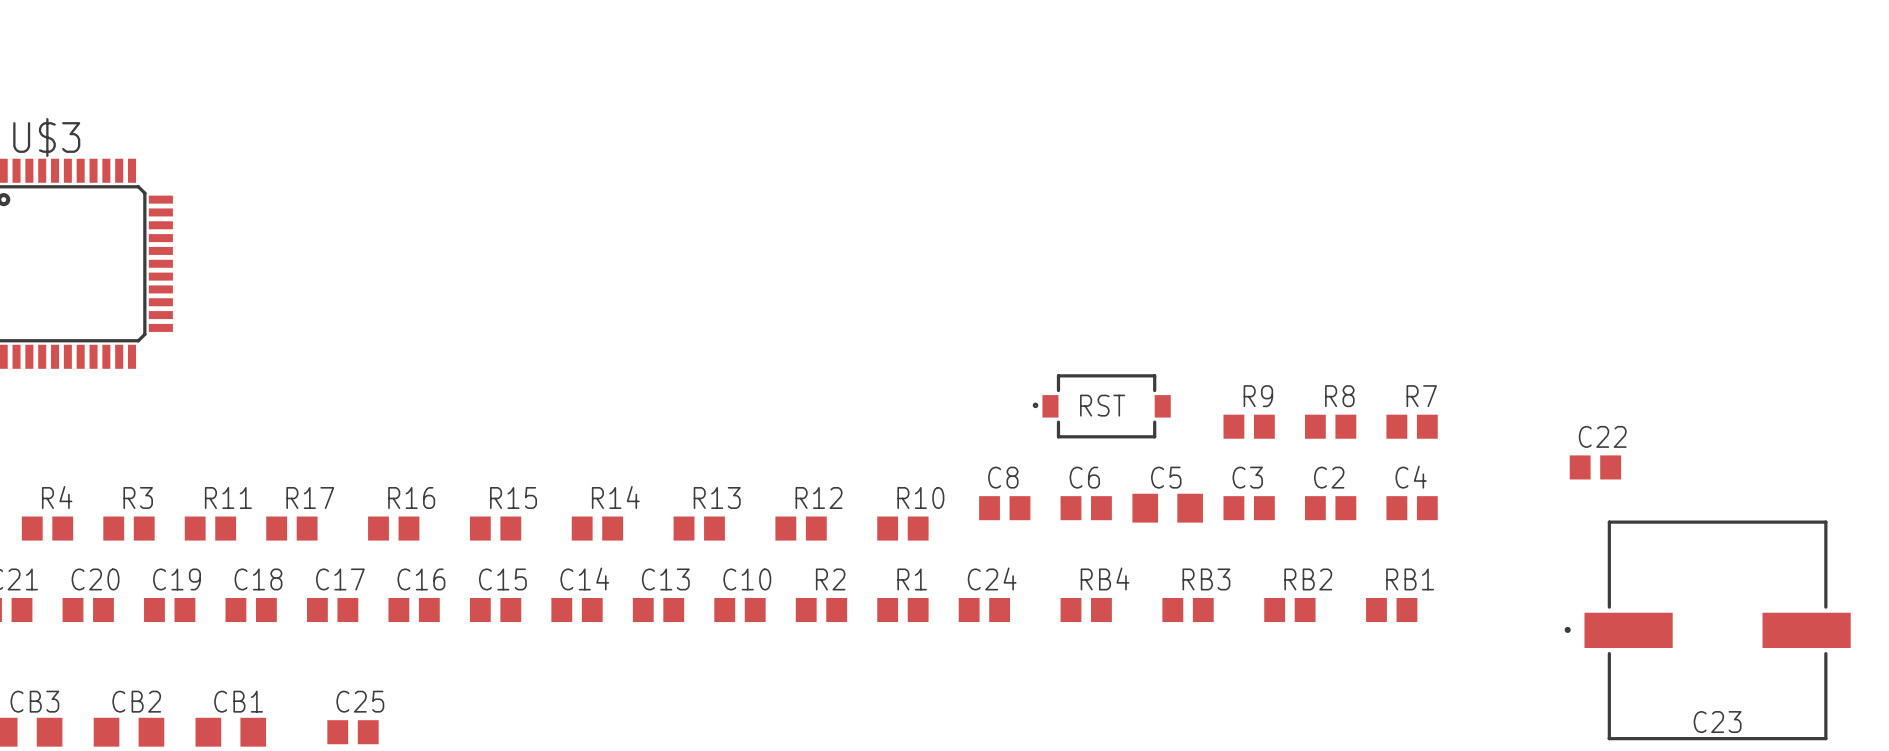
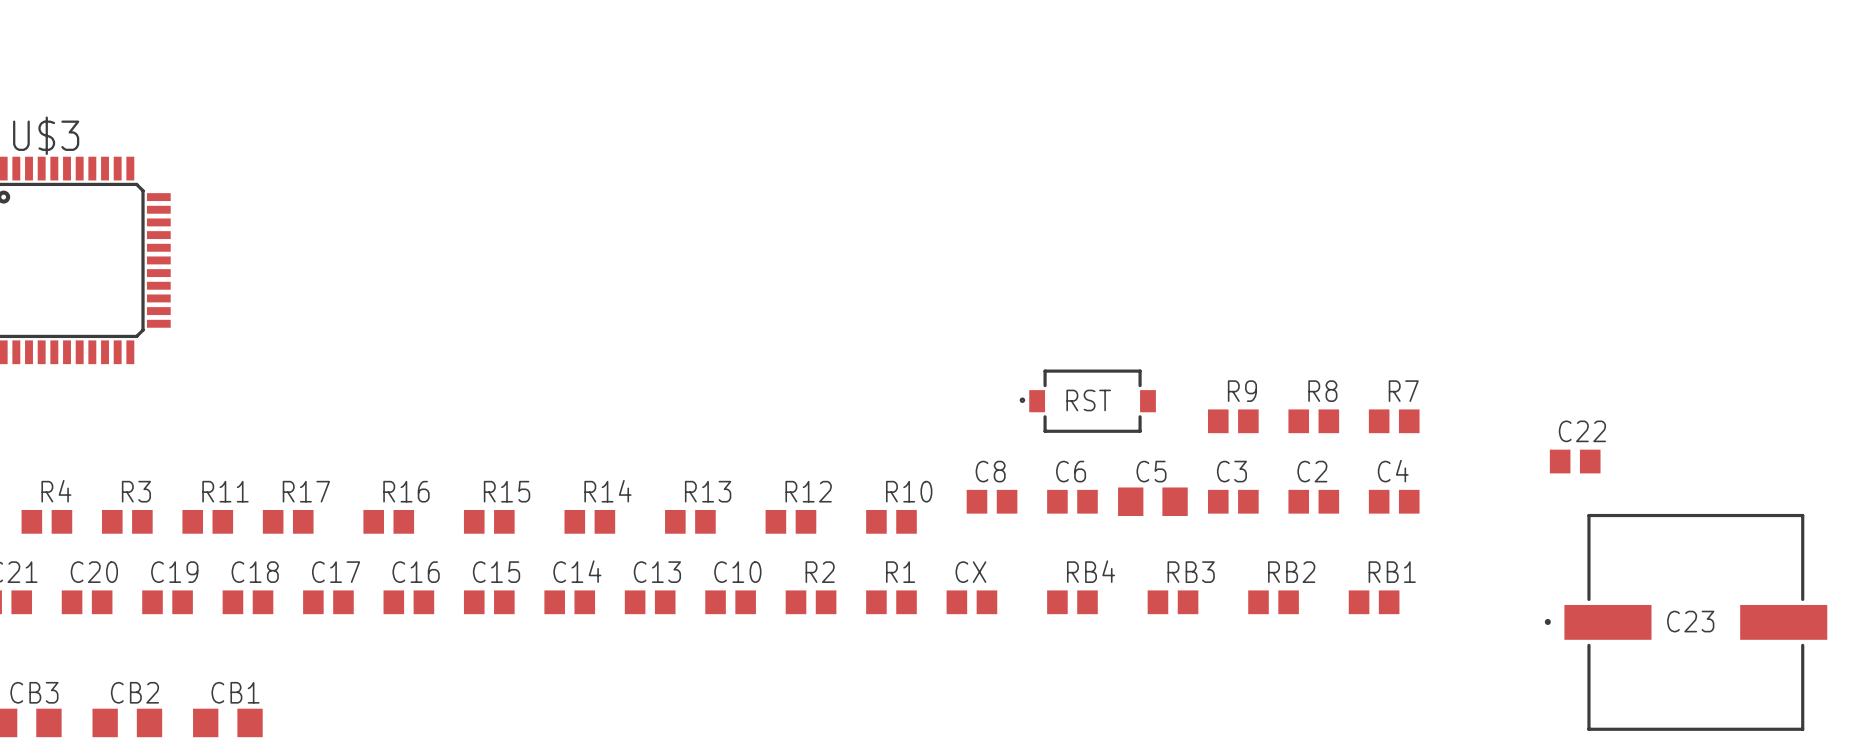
C24 name: C24 (992, 578) -> CX (970, 572)
C23 name position: C23 (1717, 722) -> C23 (1690, 621)
C25: (353, 732) -> none

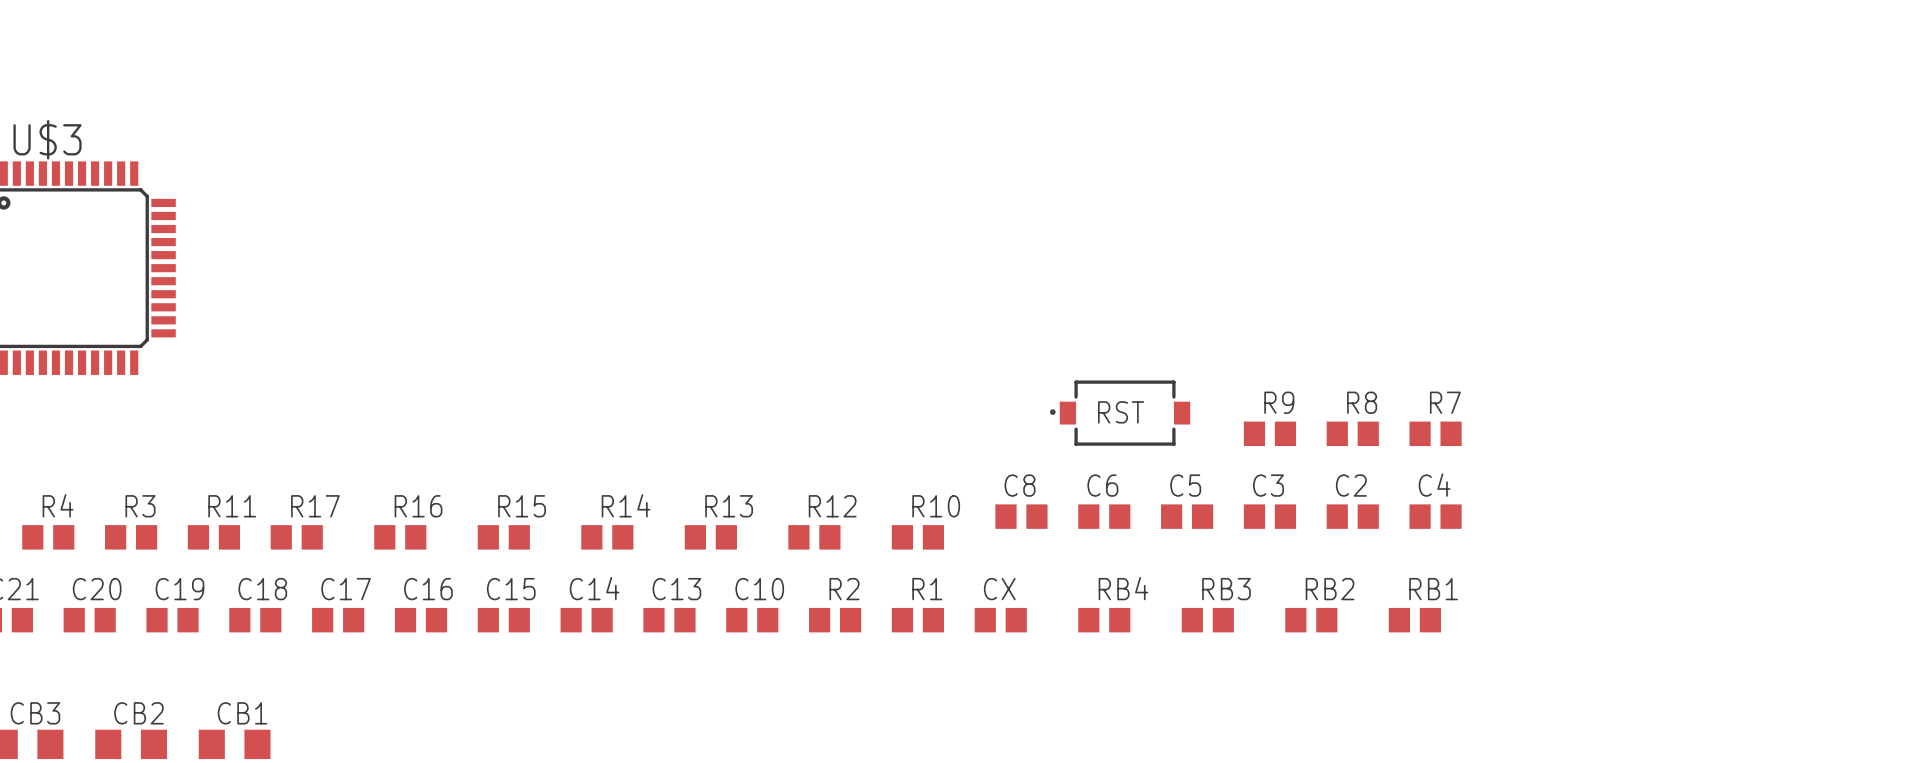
C22: (1575, 461) -> none
C5 footprint: [1118, 487, 1188, 516] -> [1161, 504, 1214, 529]
C23: (1686, 622) -> none

